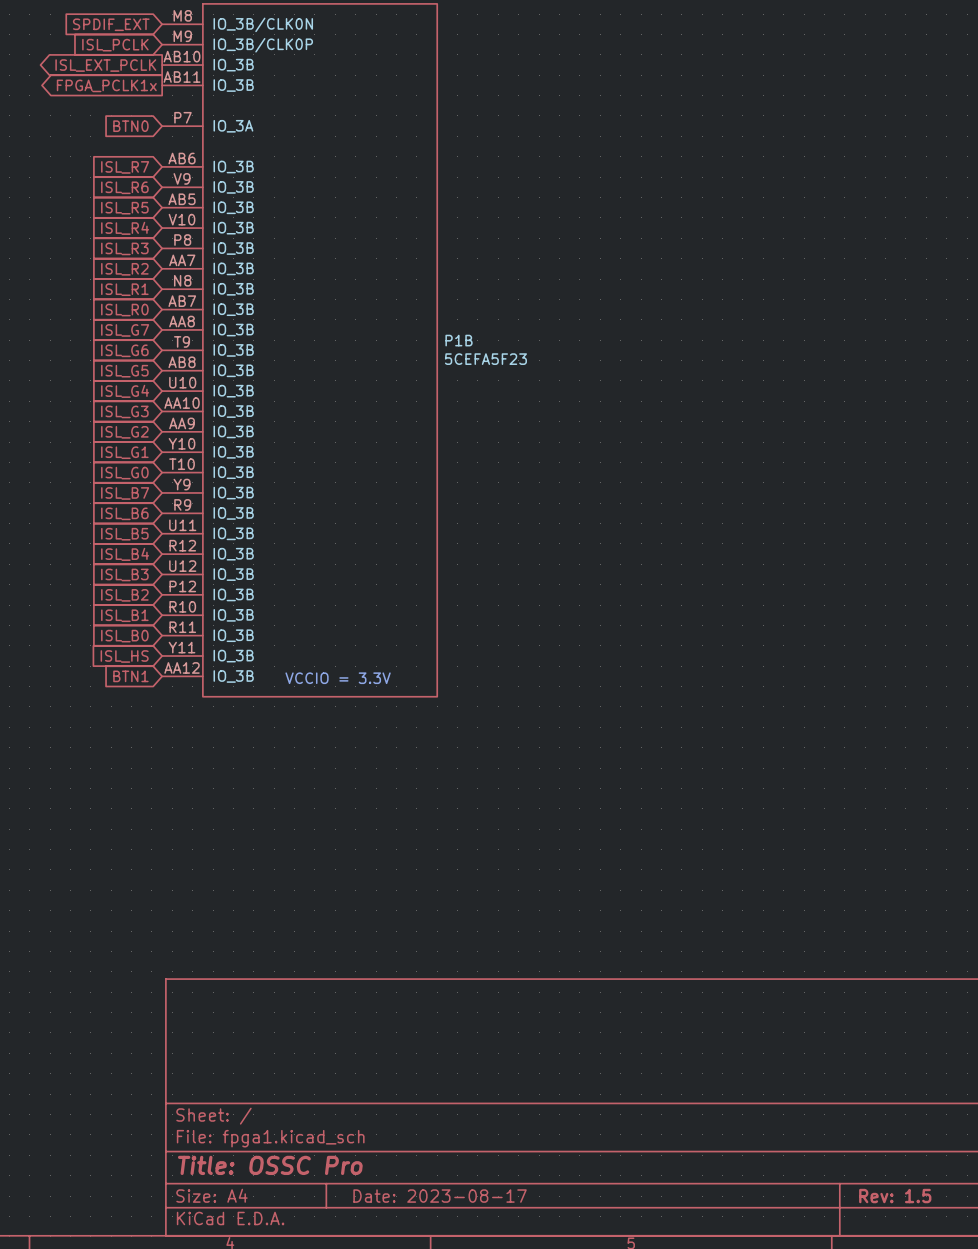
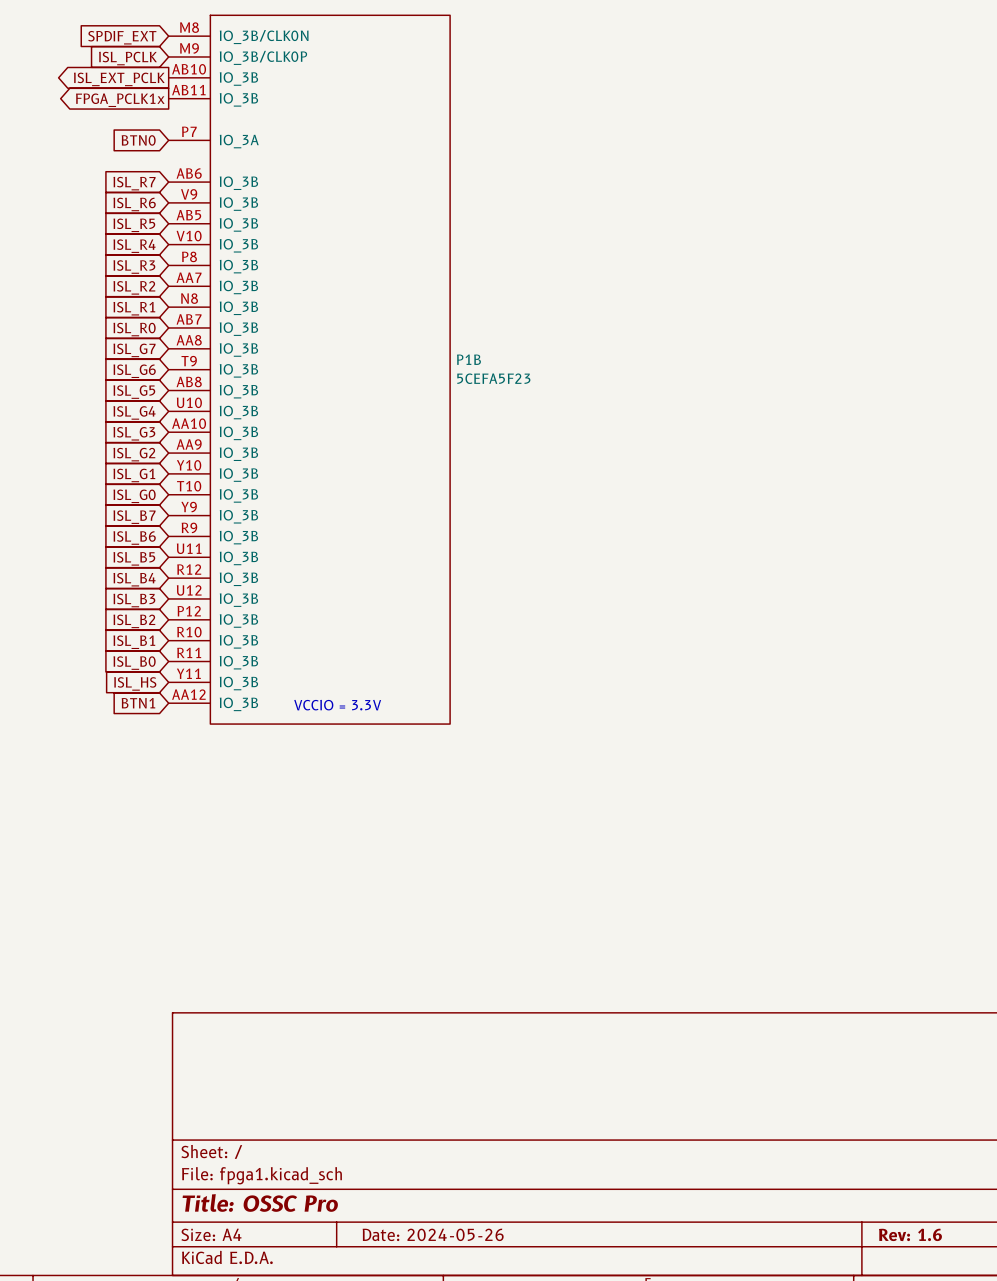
title block: Date: 2023-08-17 (440, 1196) -> Date: 2024-05-26 (433, 1234)
title block: Rev: 1.5 (895, 1196) -> Rev: 1.6 (910, 1234)

